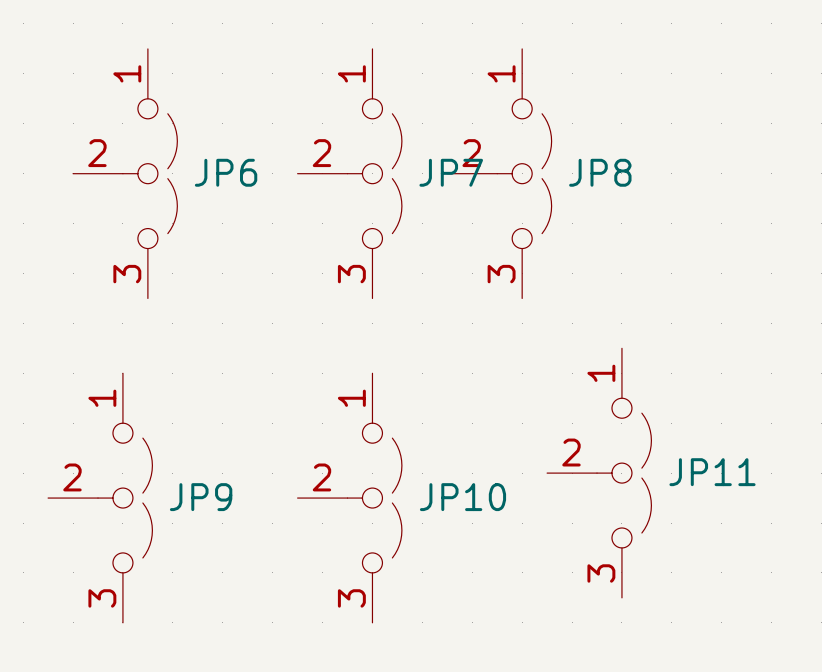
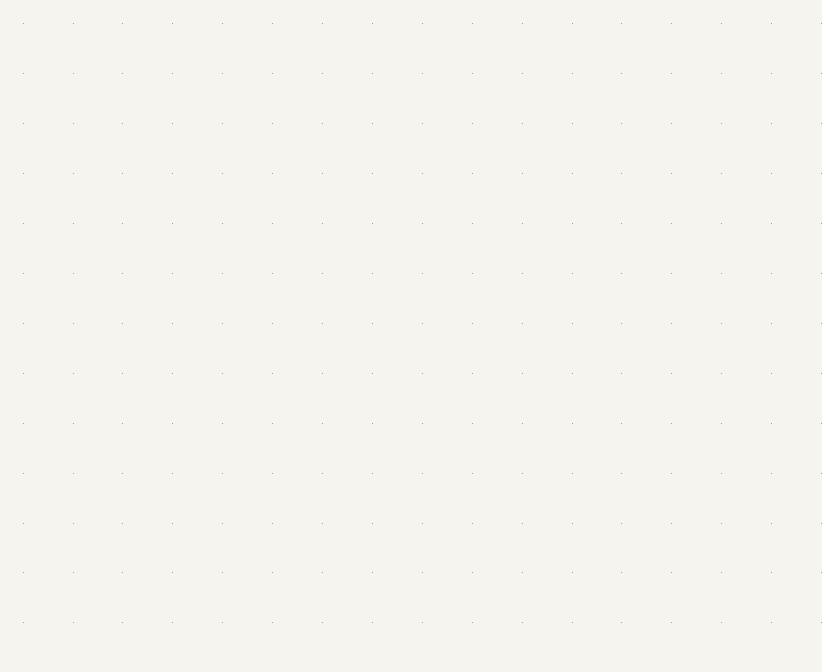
JP6: (125, 173) -> none
JP7: (349, 173) -> none
JP8: (499, 173) -> none
JP11: (599, 473) -> none
JP9: (100, 498) -> none
JP10: (349, 498) -> none

